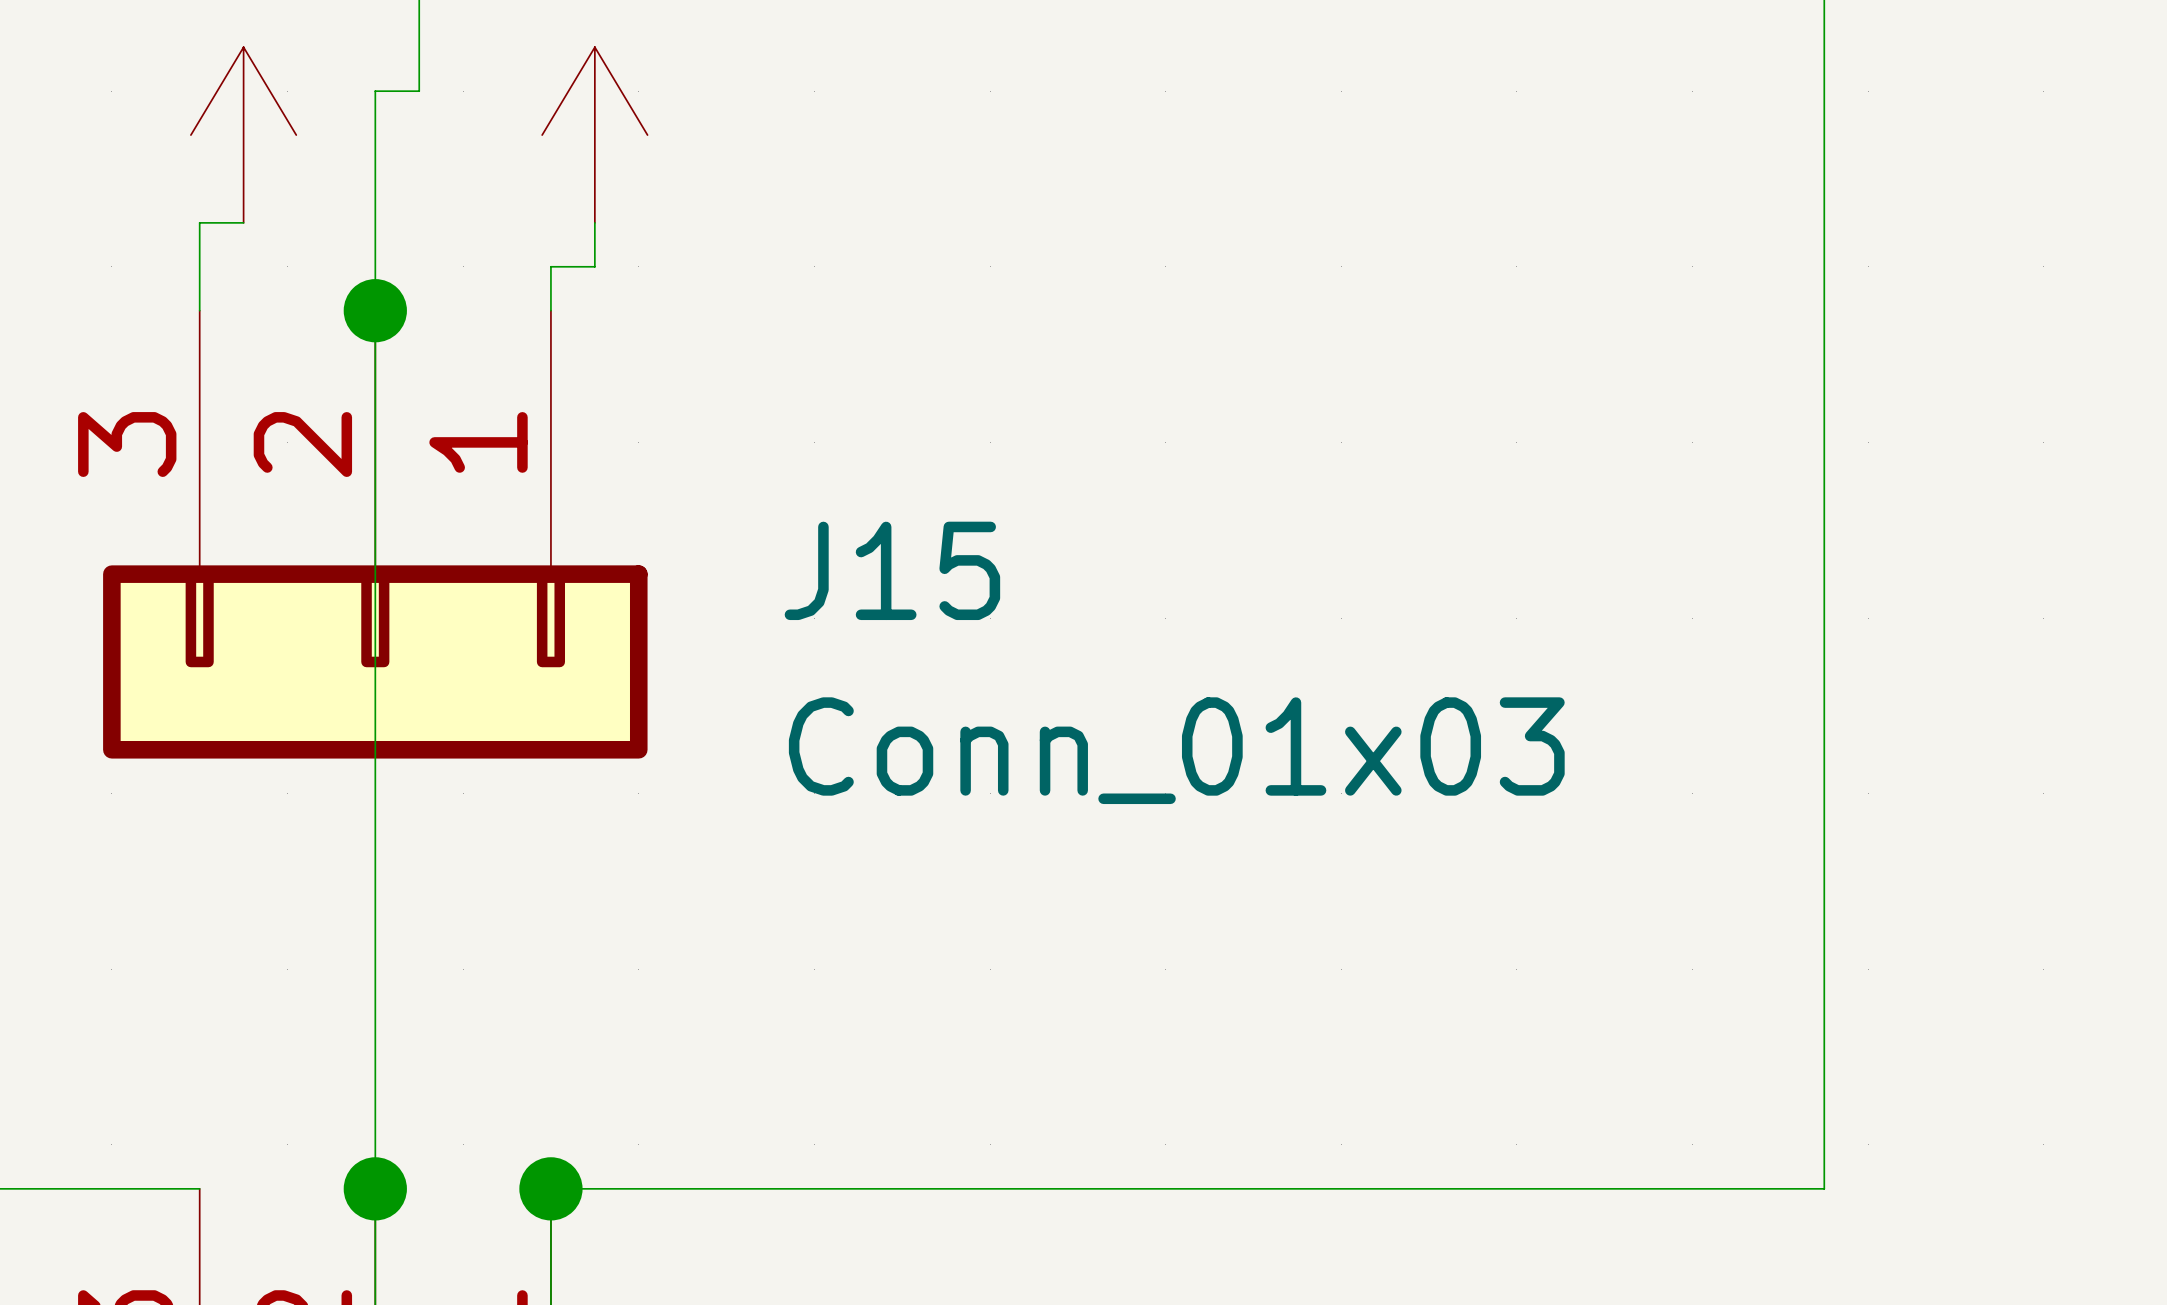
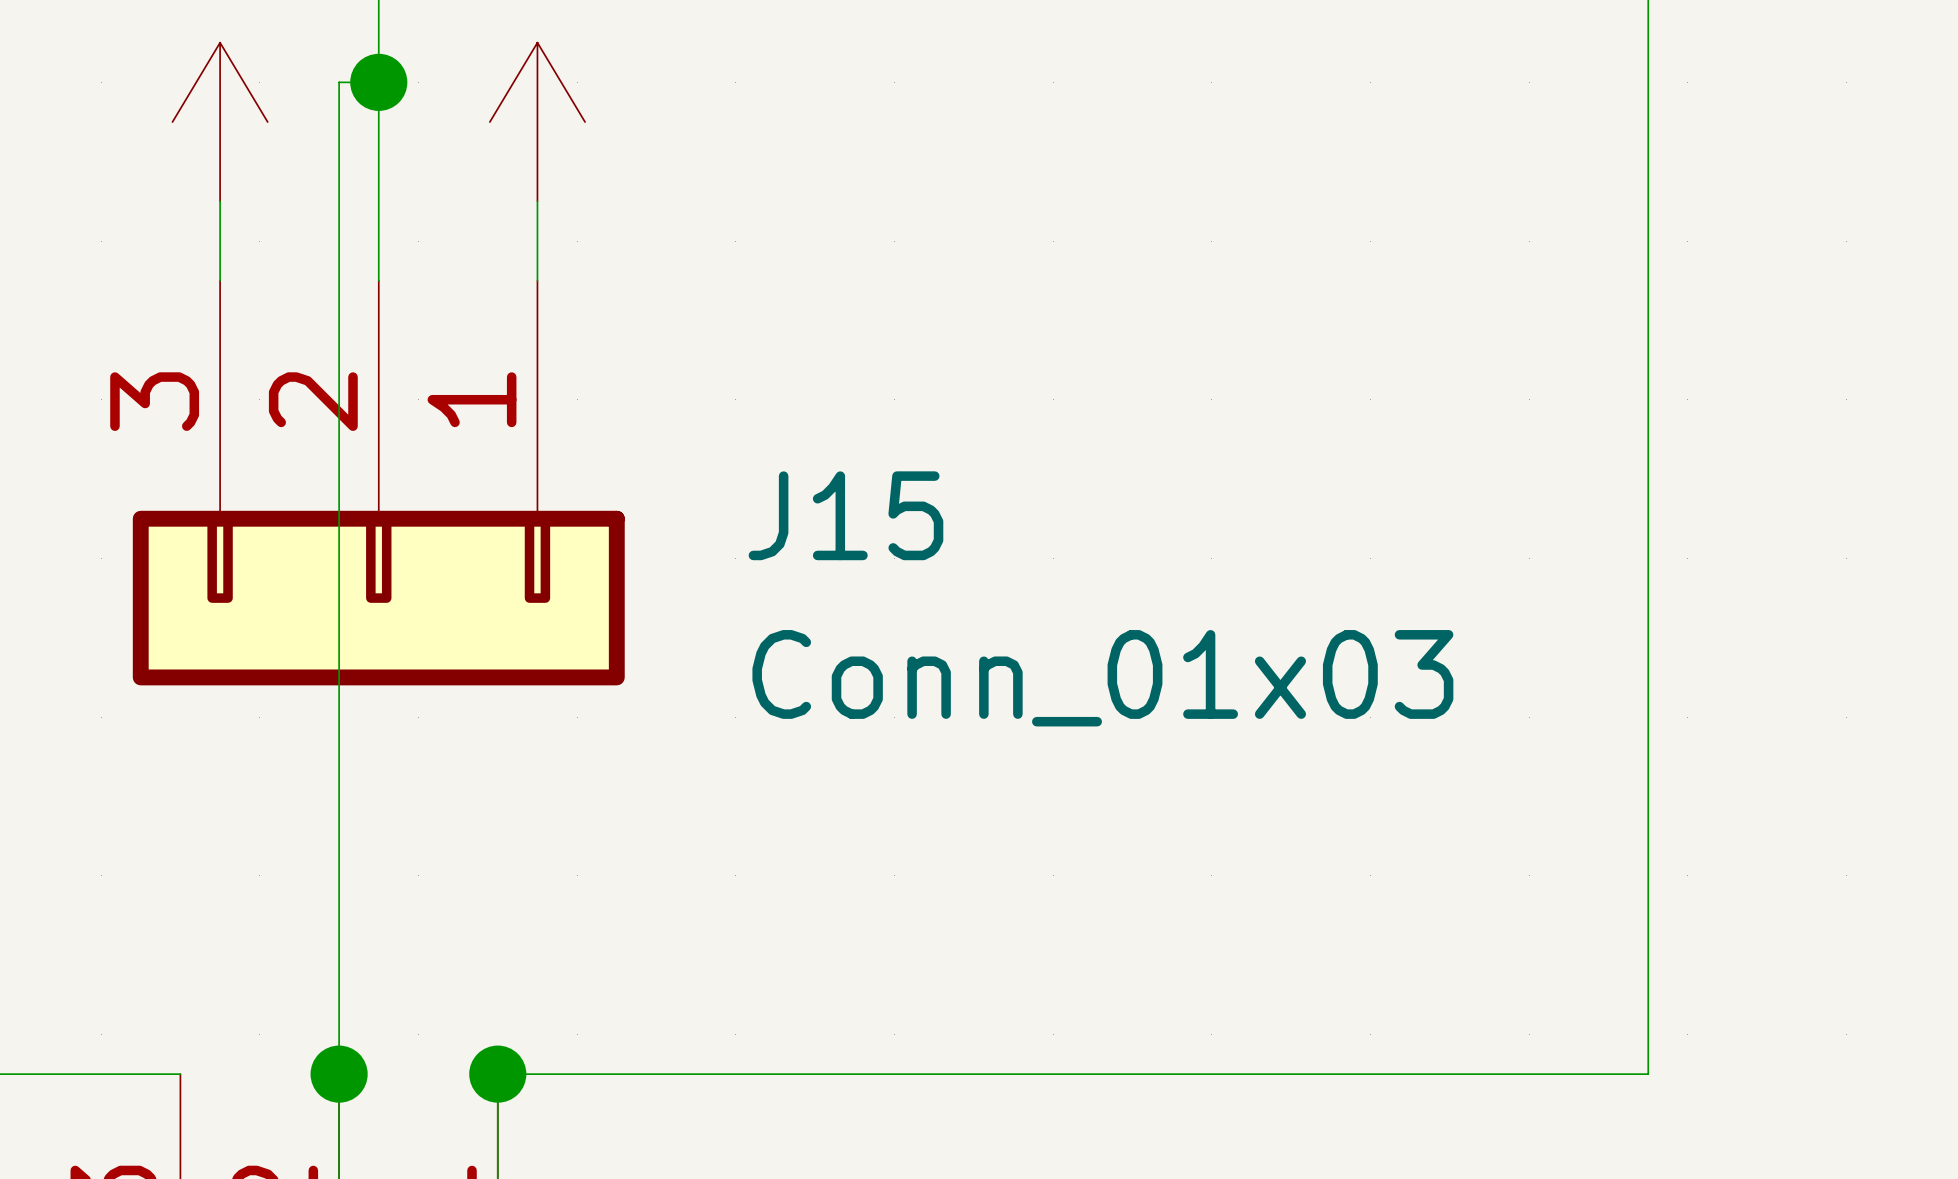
wire: none -> (378, 82) (378, 280)
wire: (243, 222) (199, 222) (199, 310) -> (220, 201) (220, 280)
wire: (594, 266) (550, 266) (550, 310) -> (537, 241) (537, 280)
junction position: (375, 310) -> (378, 82)
J15 position: (375, 534) -> (378, 483)

